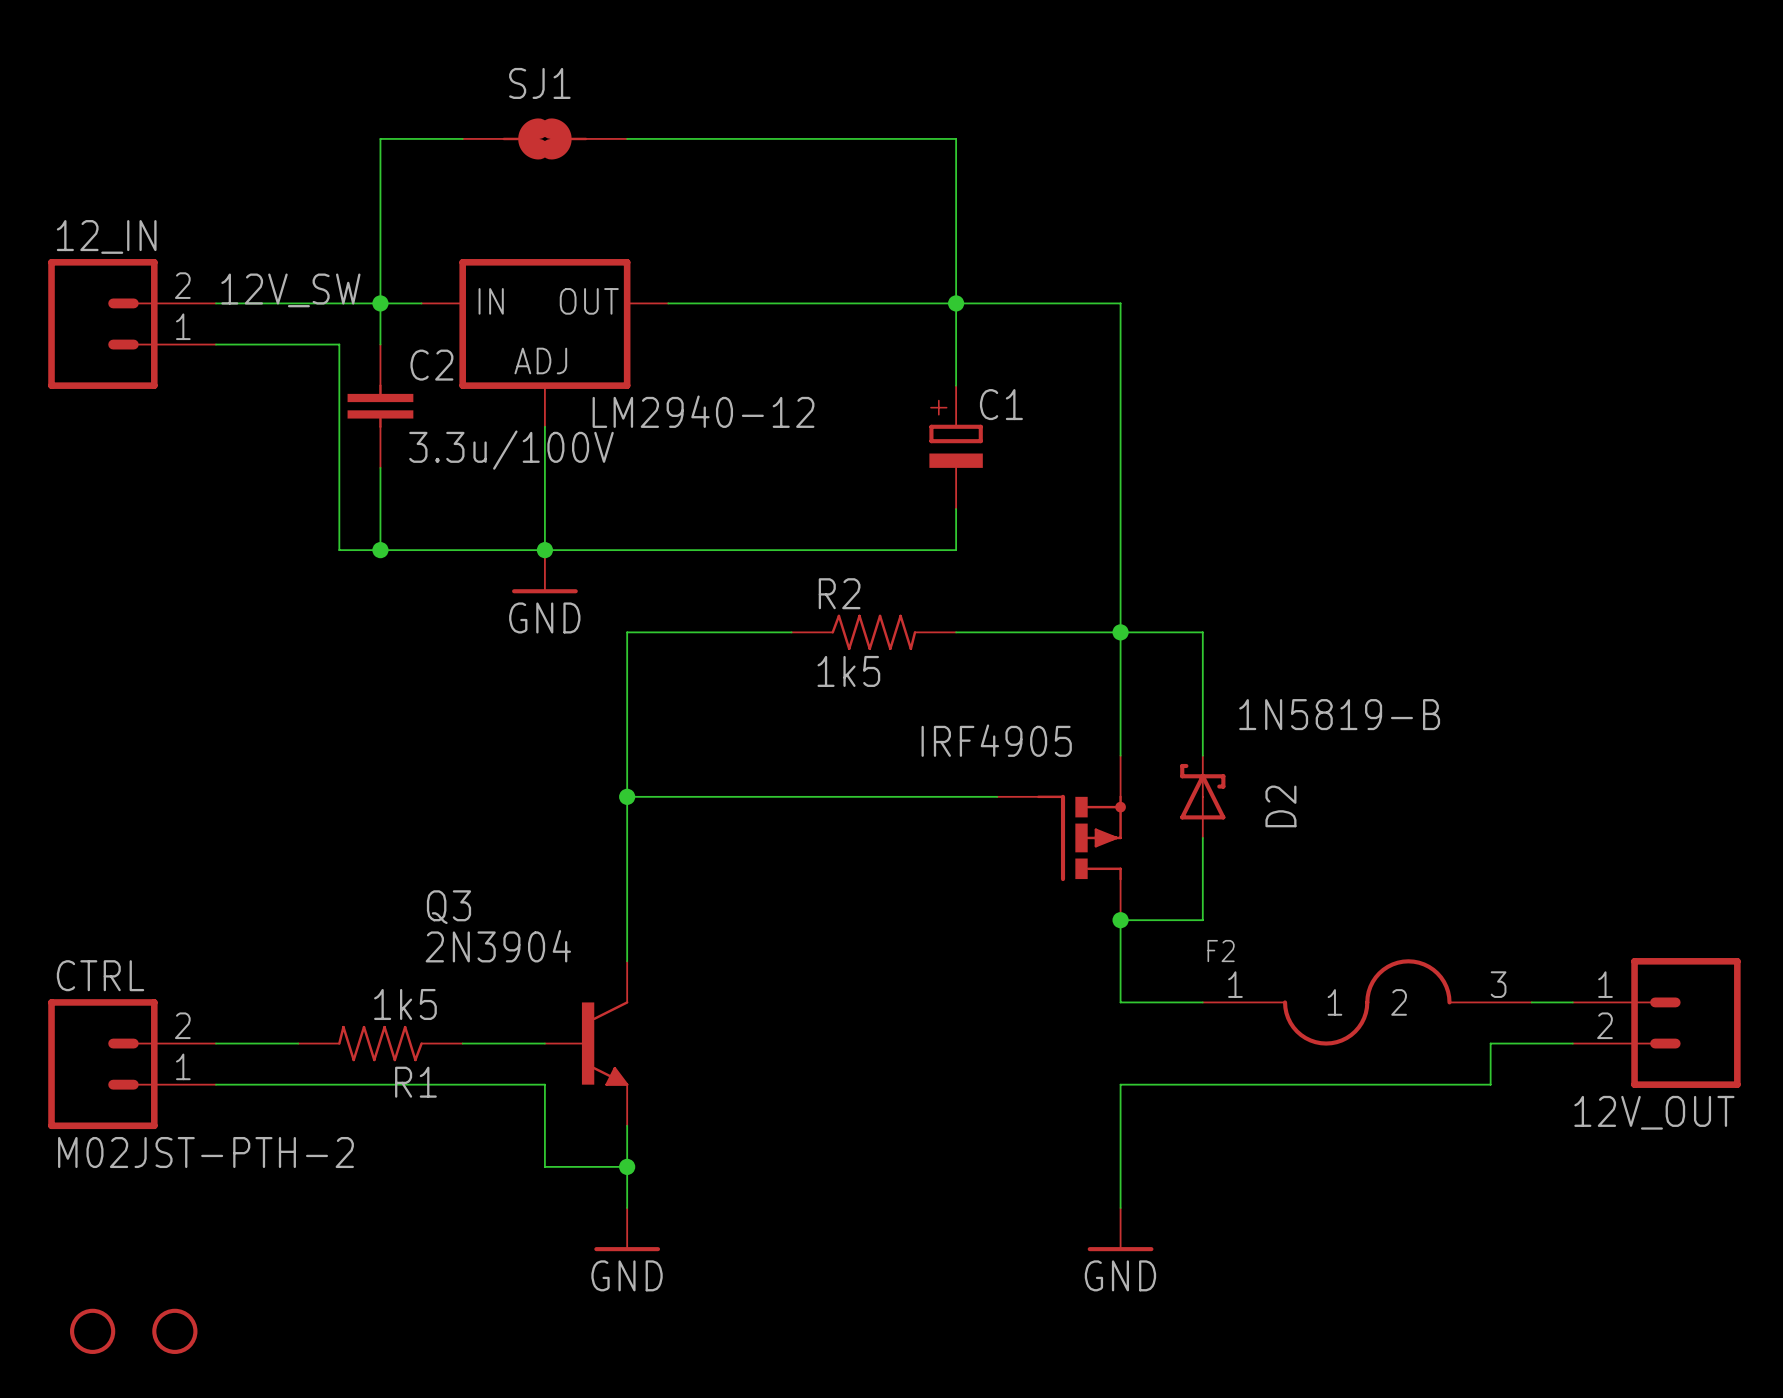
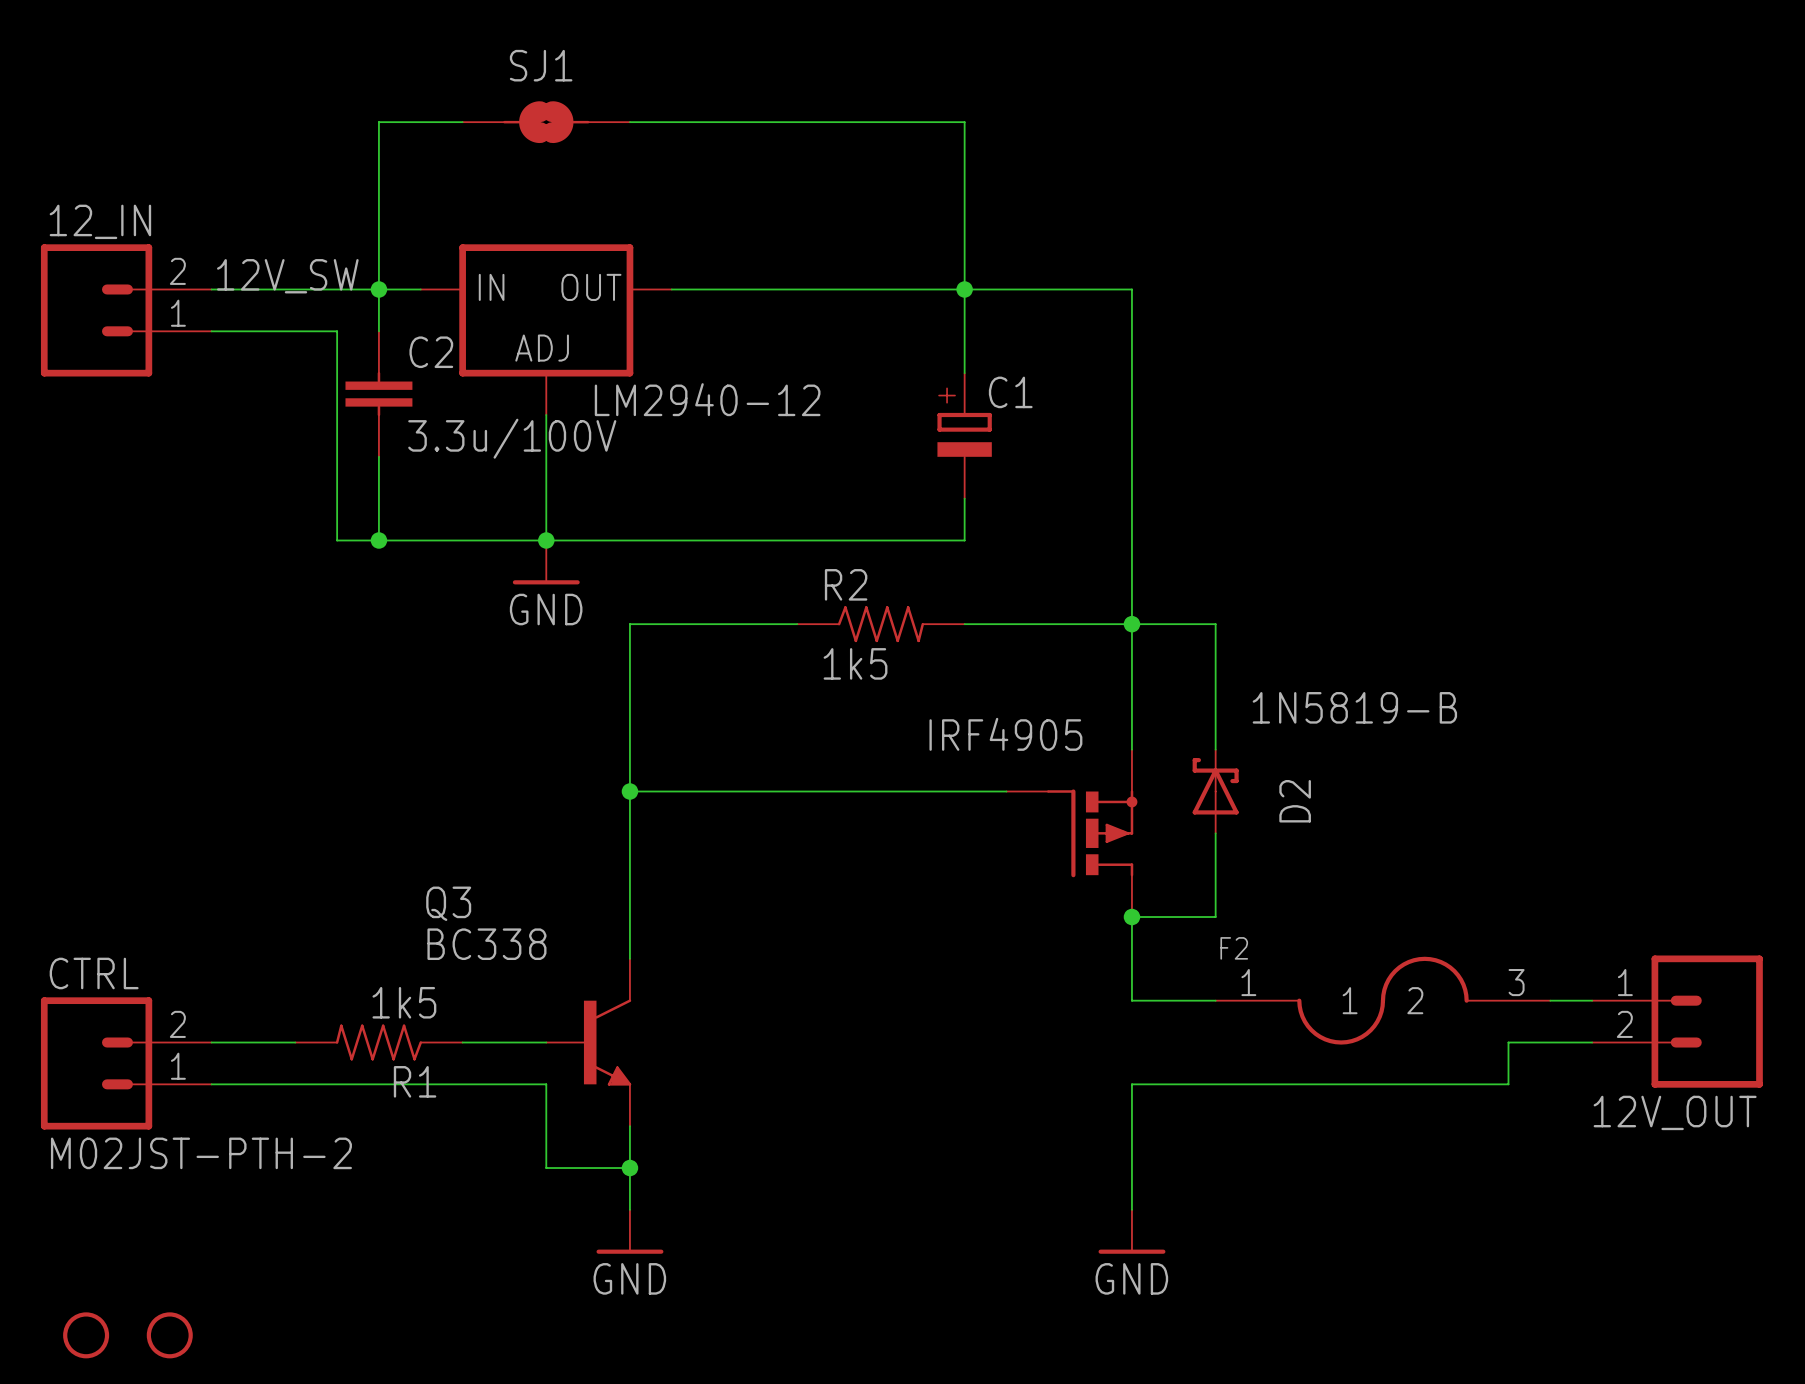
Q3 value: 2N3904 (498, 946) -> BC338 (486, 944)

